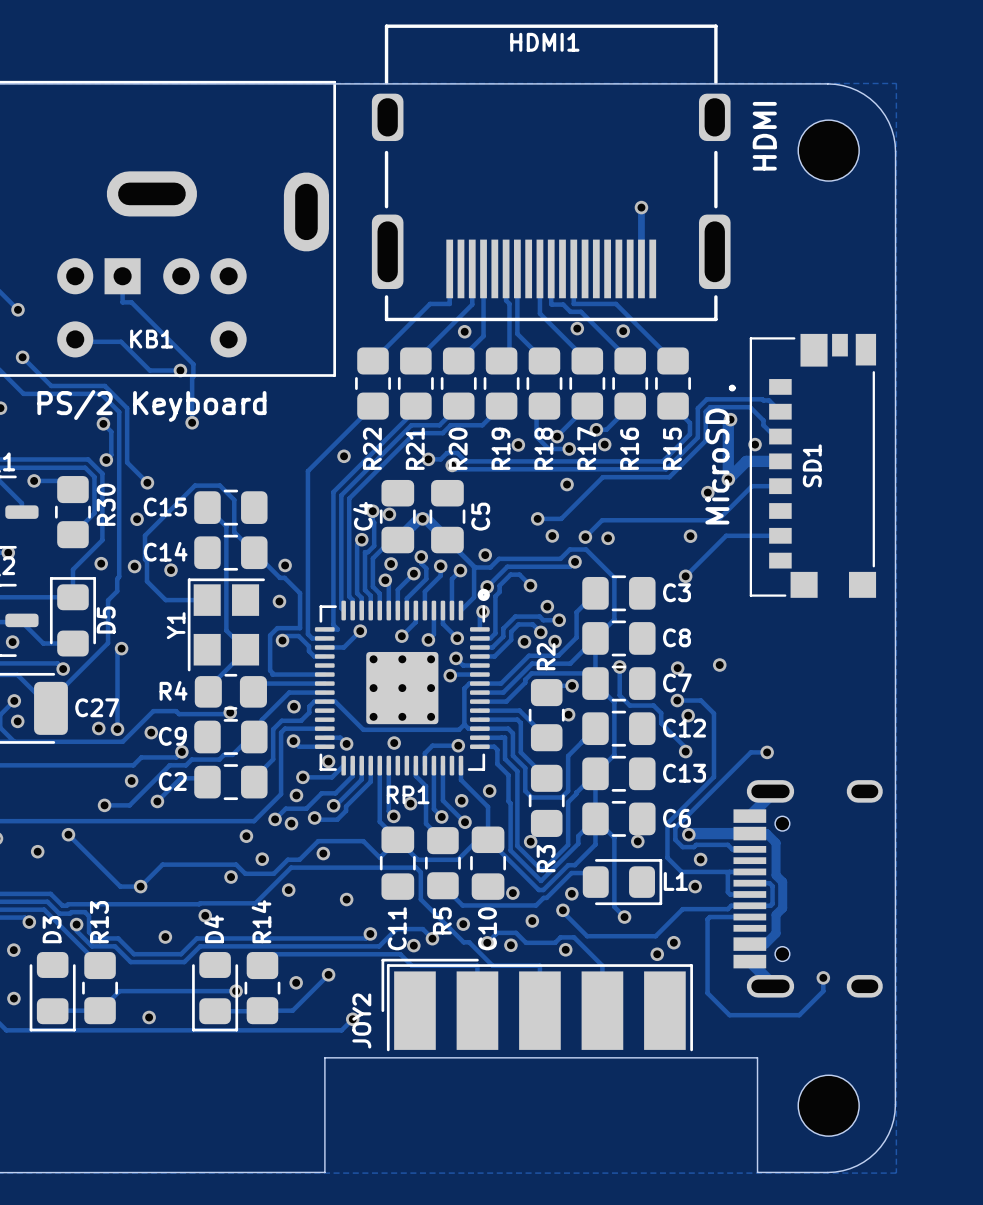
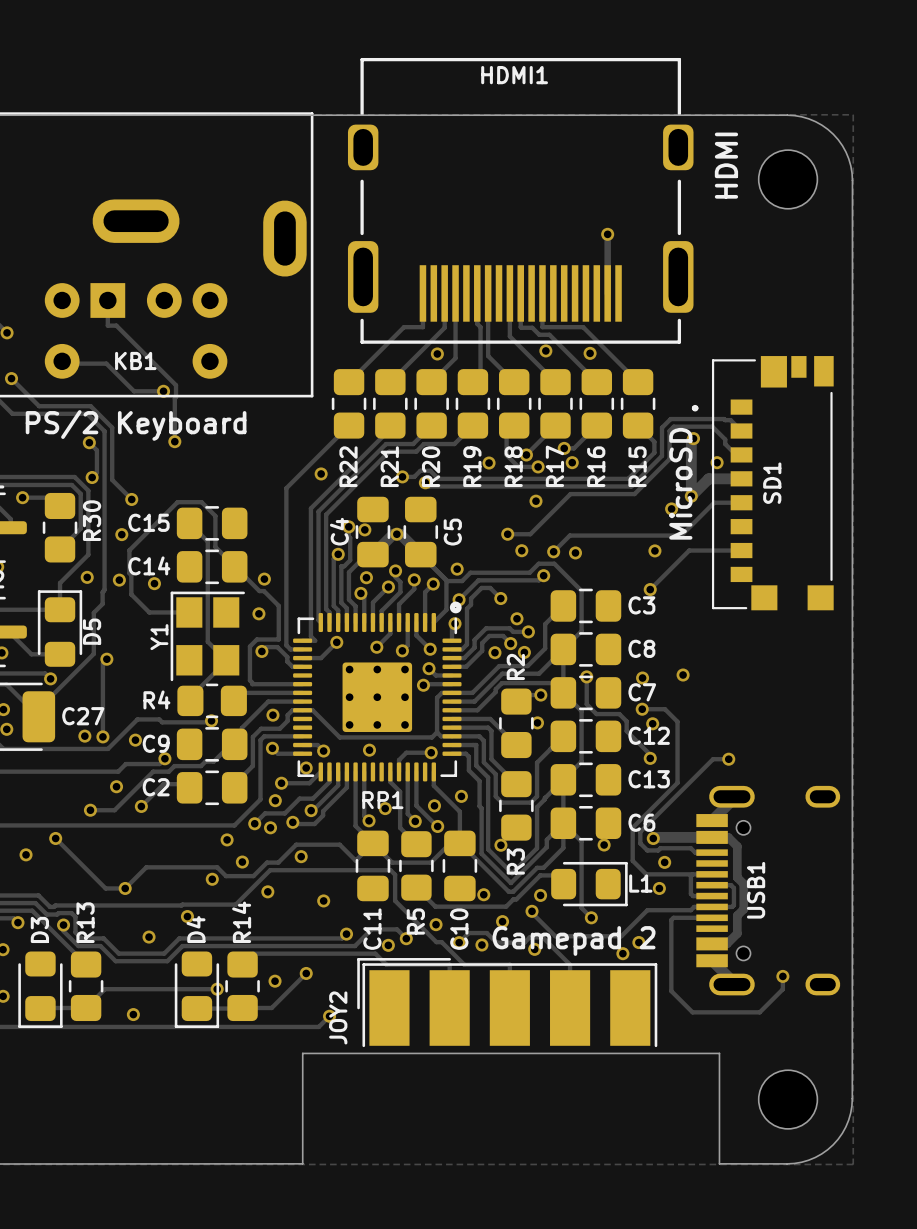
USB1 name: none -> USB1 (756, 890)
text: none -> Gamepad 2 (574, 940)

